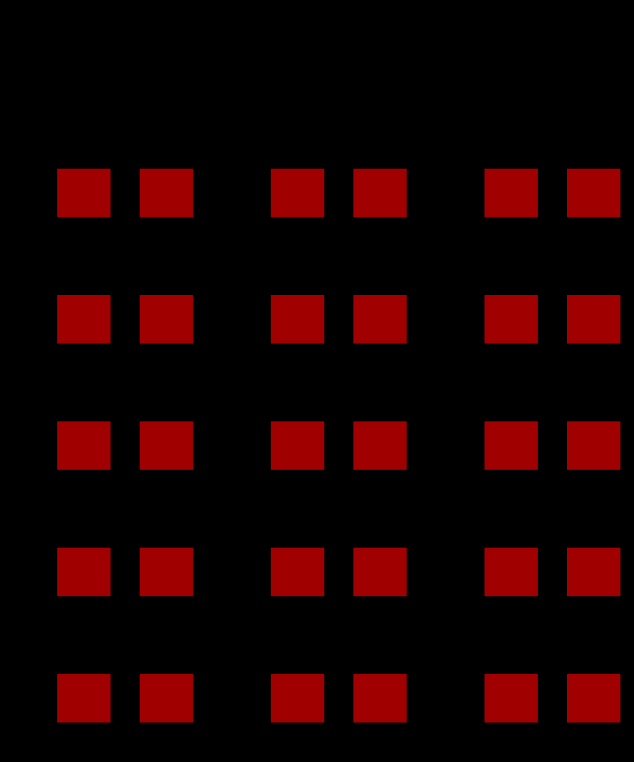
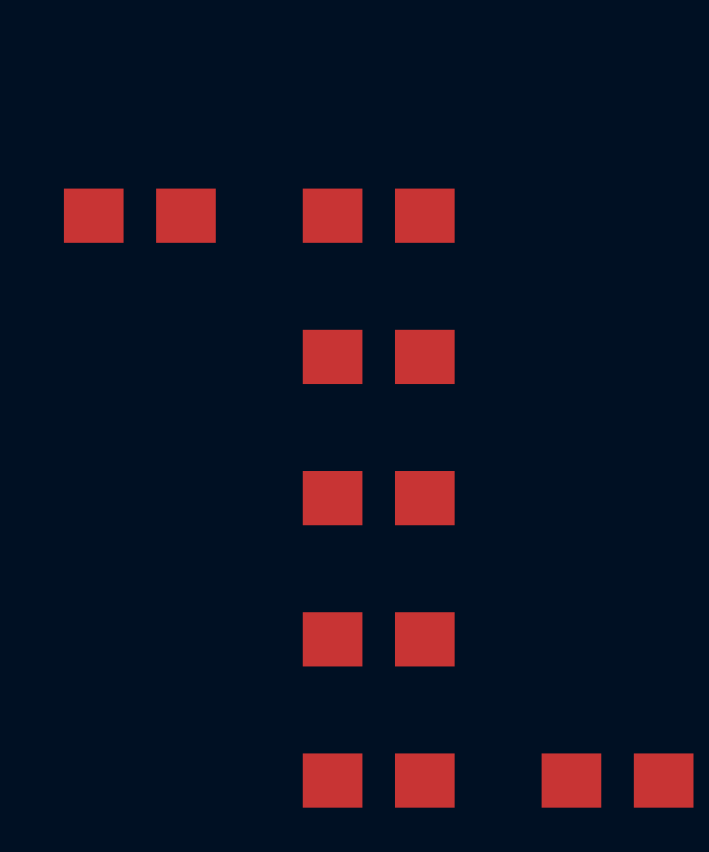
part: (552, 192) -> none
part: (125, 319) -> none
part: (552, 319) -> none
part: (125, 445) -> none
part: (552, 445) -> none
part: (125, 571) -> none
part: (552, 571) -> none
part: (125, 698) -> none

